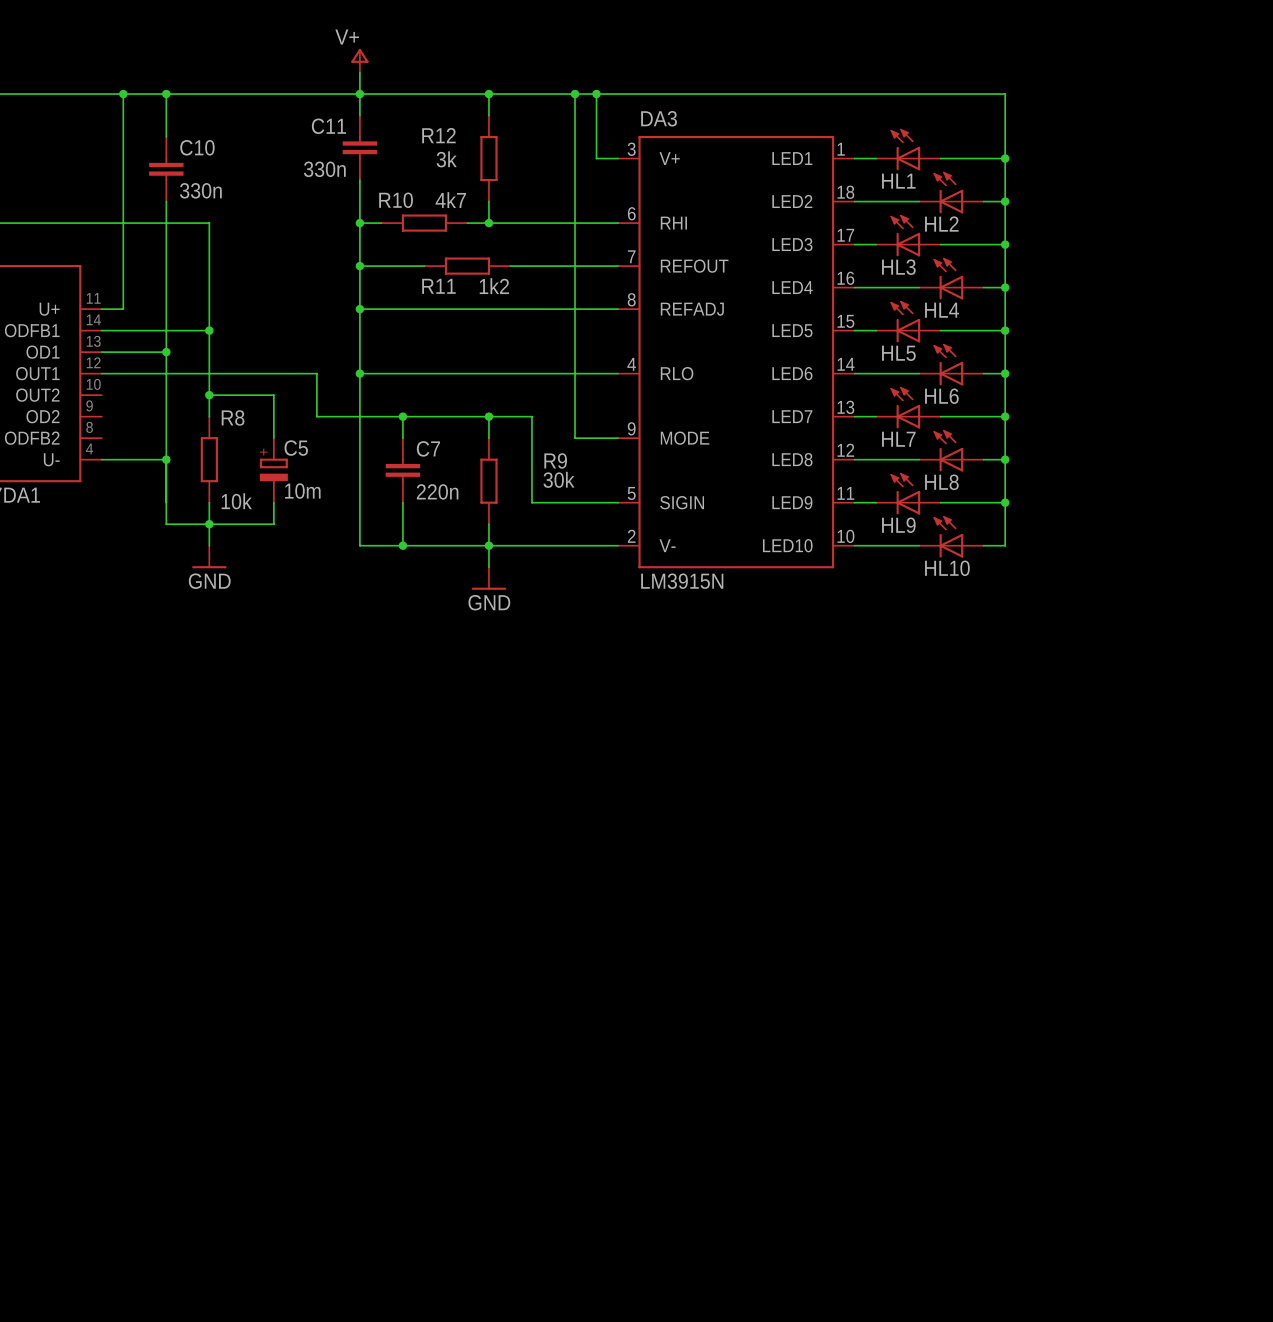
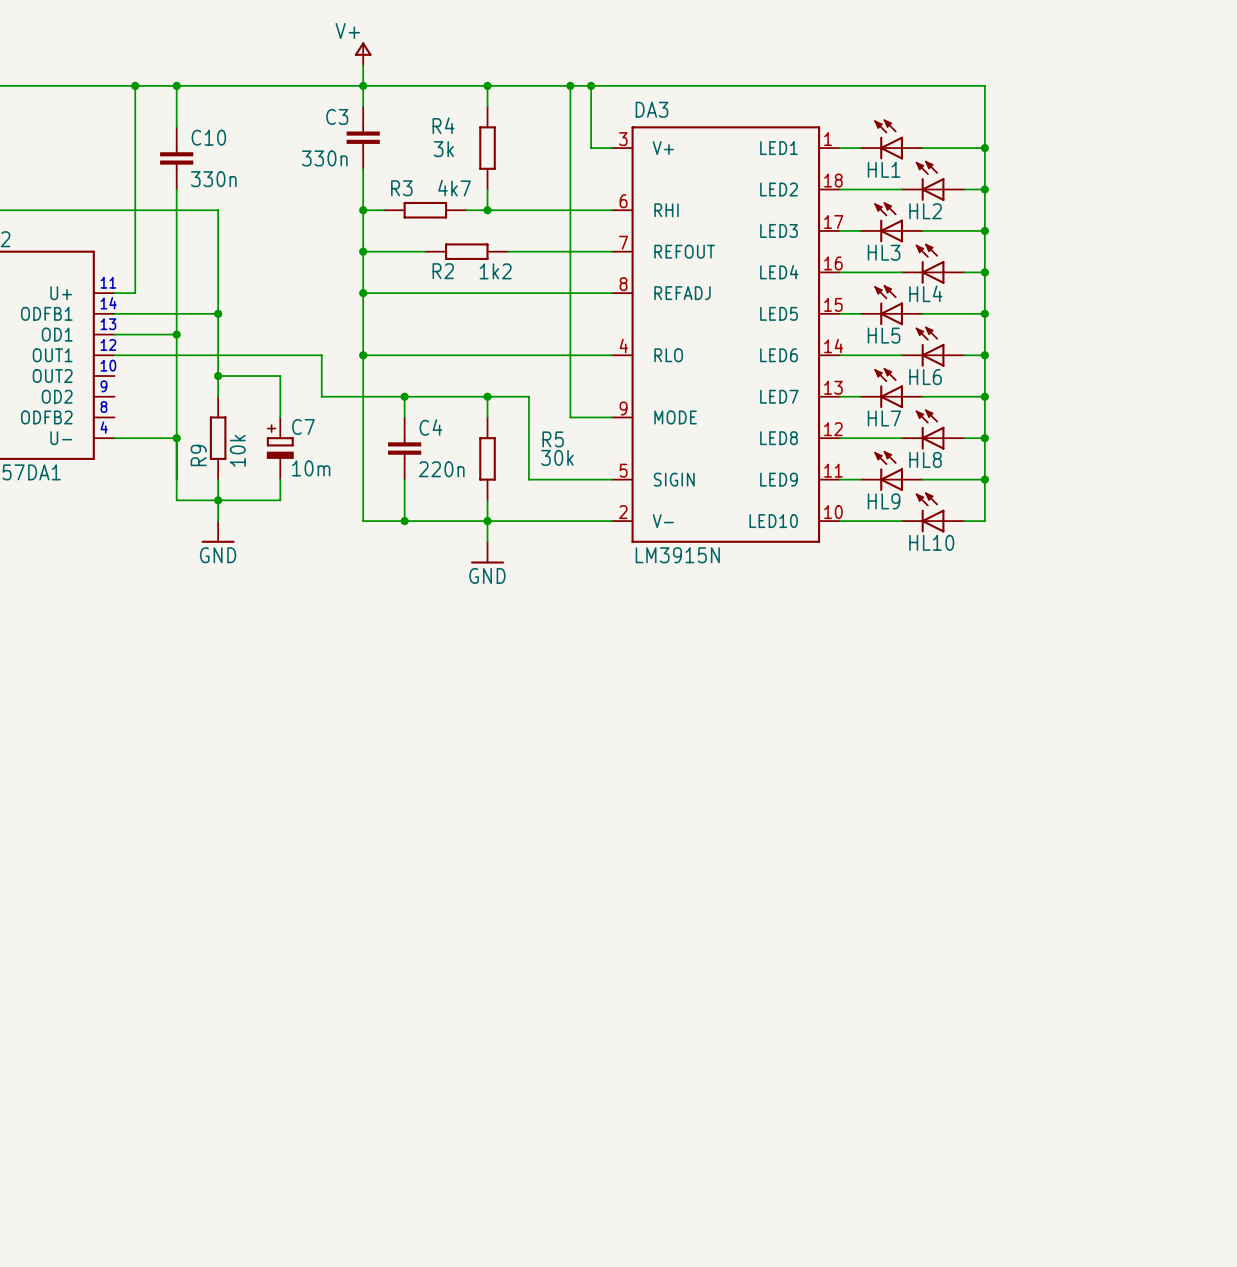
C11 name: C11 (328, 126) -> C3 (337, 116)
R12 name: R12 (438, 135) -> R4 (443, 125)
R10 name: R10 (396, 200) -> R3 (401, 188)
R11 name: R11 (438, 286) -> R2 (443, 271)
R8 name: R8 (233, 417) -> R9 (198, 455)
C5 name: C5 (296, 448) -> C7 (303, 426)
C7 name: C7 (428, 448) -> C4 (430, 427)
R9 name: R9 (555, 460) -> R5 (553, 439)
R8 value rotation: 0° (236, 501) -> 90° counterclockwise (237, 450)

